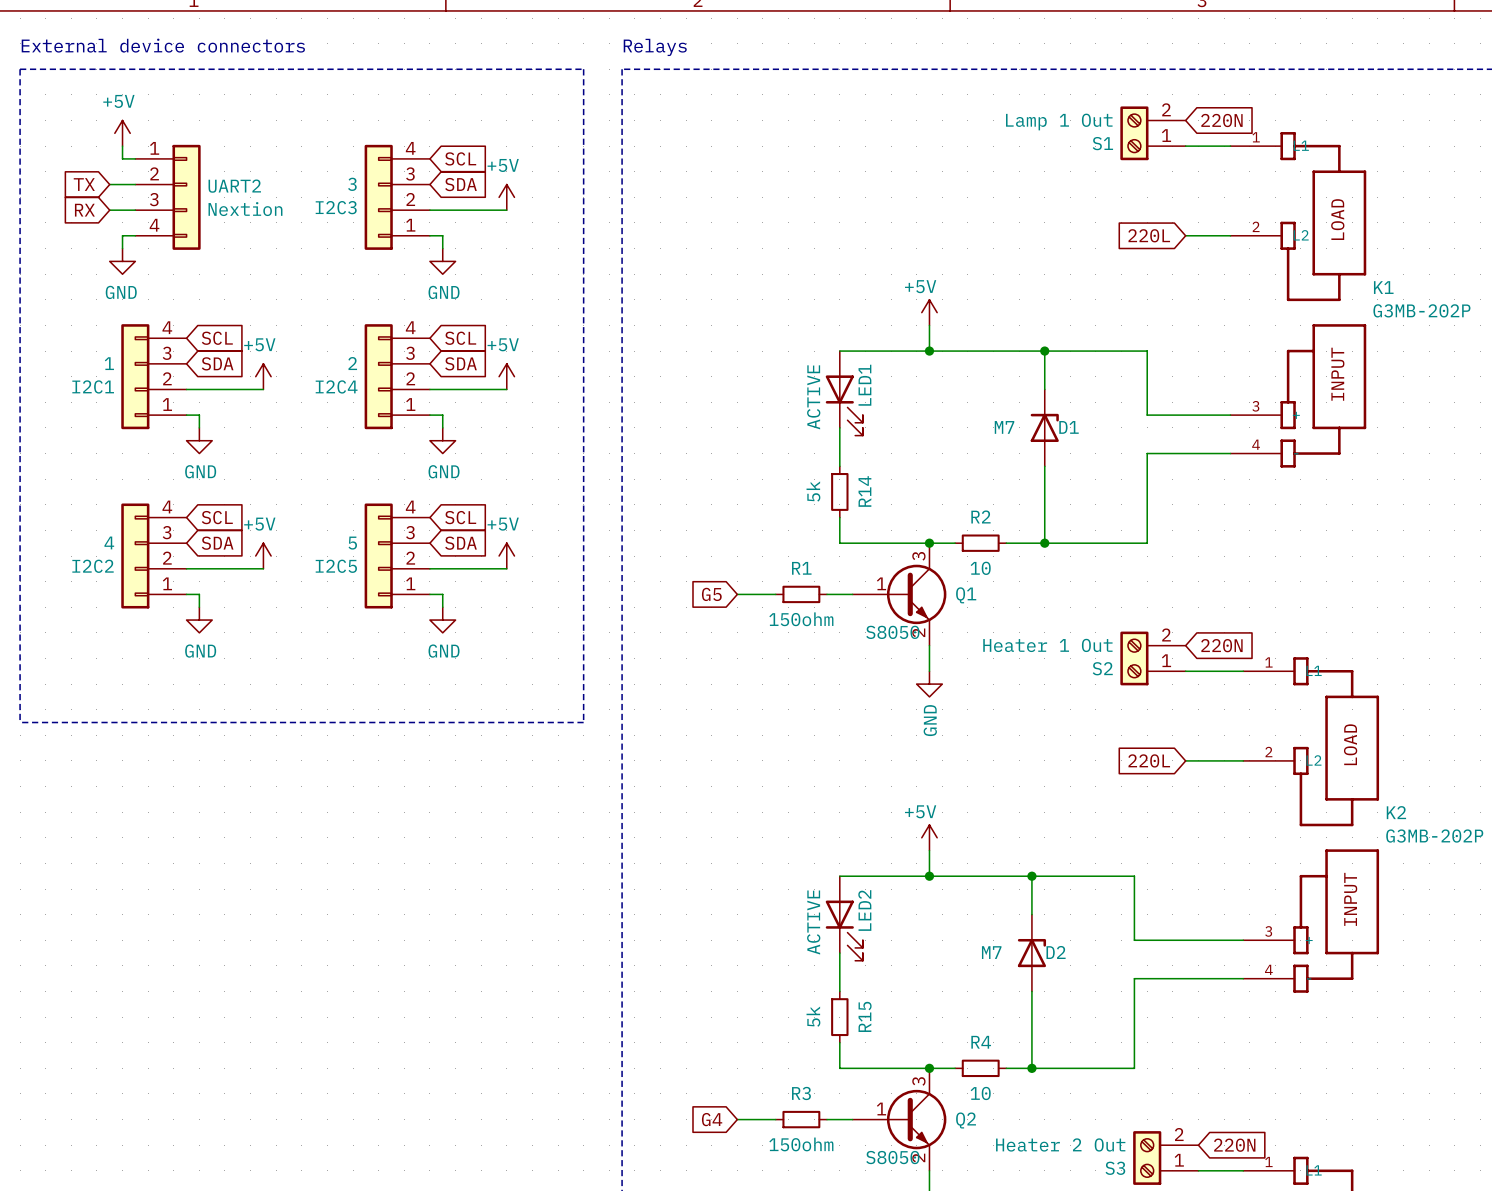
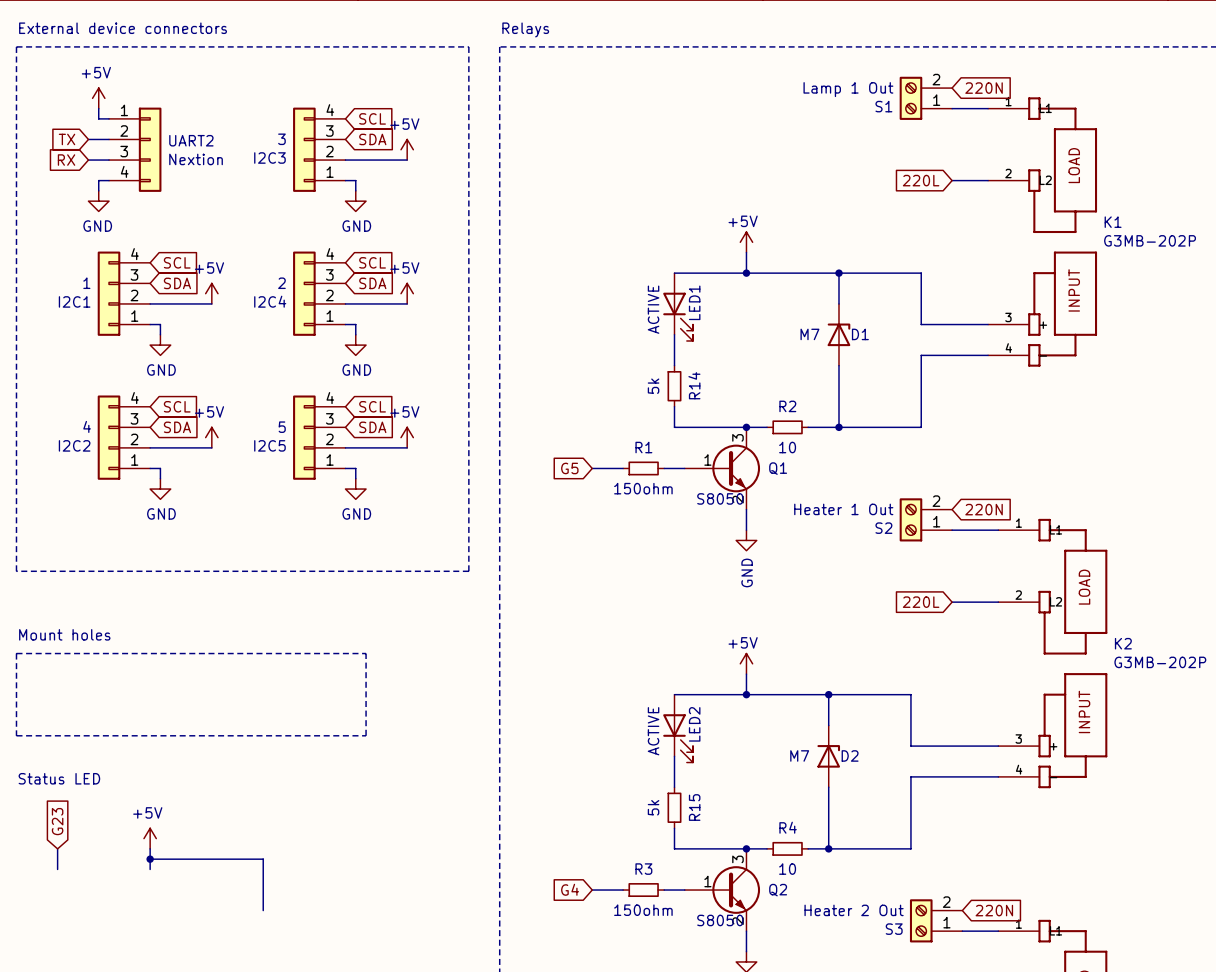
text: none -> Mount holes (64, 634)
line: none -> (16, 653) (16, 735) (366, 735) (366, 653) (16, 653)
text: none -> Status LED (59, 778)
global label: none -> G23 (57, 821)
power symbol: none -> +5V (150, 838)
wire: none -> (57, 848) (57, 869)
wire: none -> (150, 848) (150, 869)
wire: none -> (150, 859) (263, 859) (263, 910)
junction: none -> (150, 859)

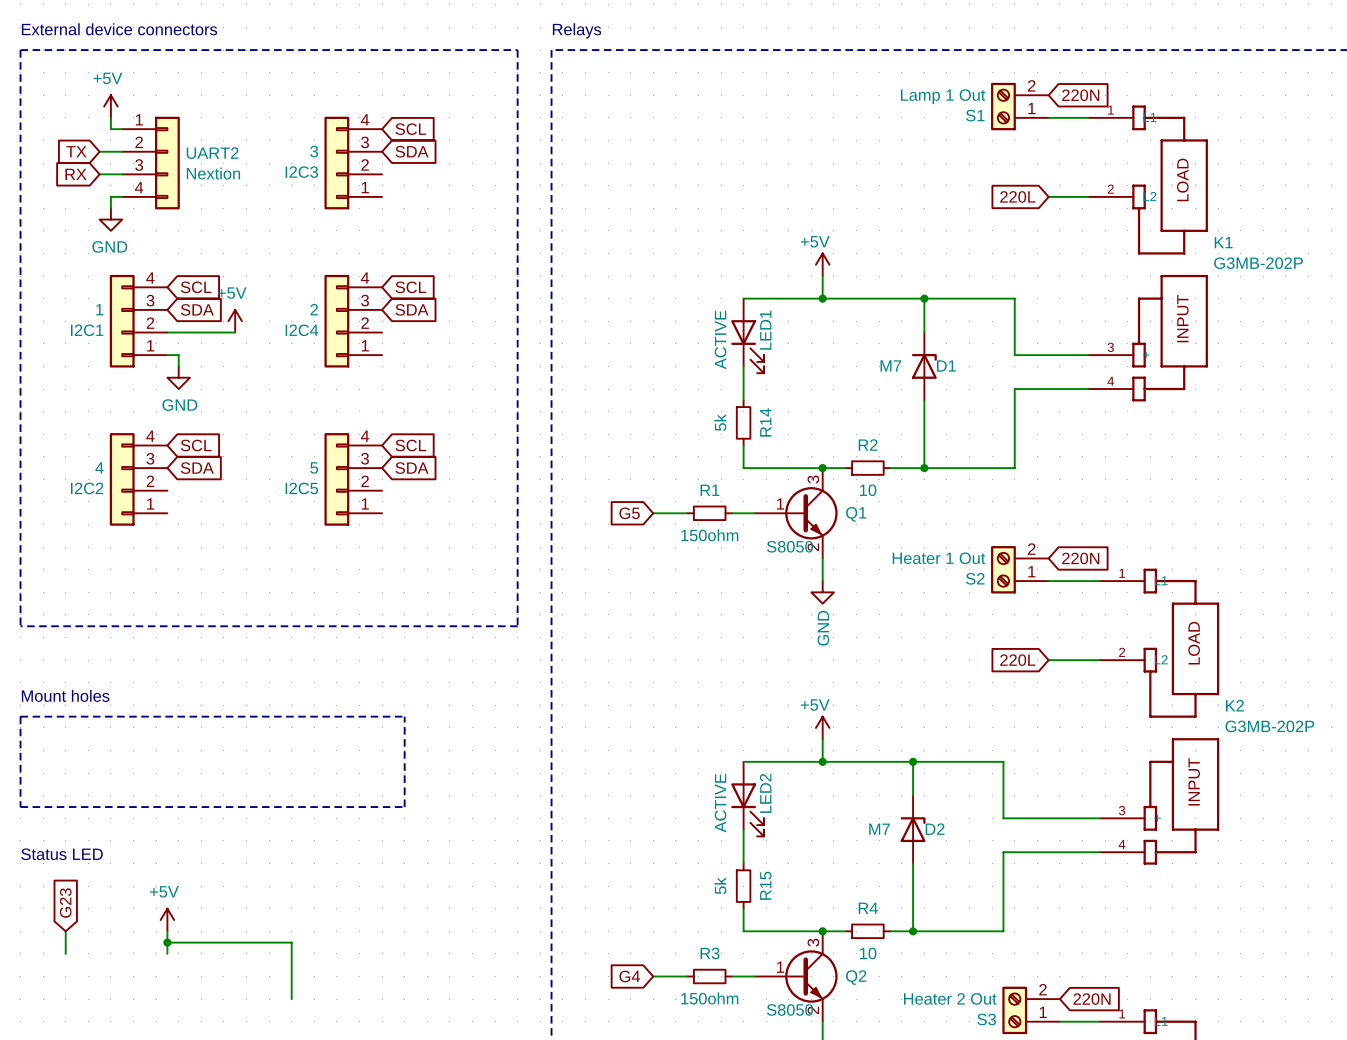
power symbol: +5V (407, 149) -> none
wire: (345, 160) (407, 160) -> none
wire: (345, 180) (355, 180) (355, 190) -> none
power symbol: GND (355, 201) -> none
power symbol: +5V (407, 293) -> none
wire: (345, 303) (407, 303) -> none
wire: (345, 324) (355, 324) (355, 334) -> none
power symbol: GND (355, 345) -> none
power symbol: +5V (211, 437) -> none
power symbol: +5V (407, 437) -> none
wire: (150, 447) (211, 447) -> none
wire: (345, 447) (407, 447) -> none
wire: (150, 468) (160, 468) (160, 478) -> none
wire: (345, 468) (355, 468) (355, 478) -> none
power symbol: GND (160, 489) -> none
power symbol: GND (355, 489) -> none

